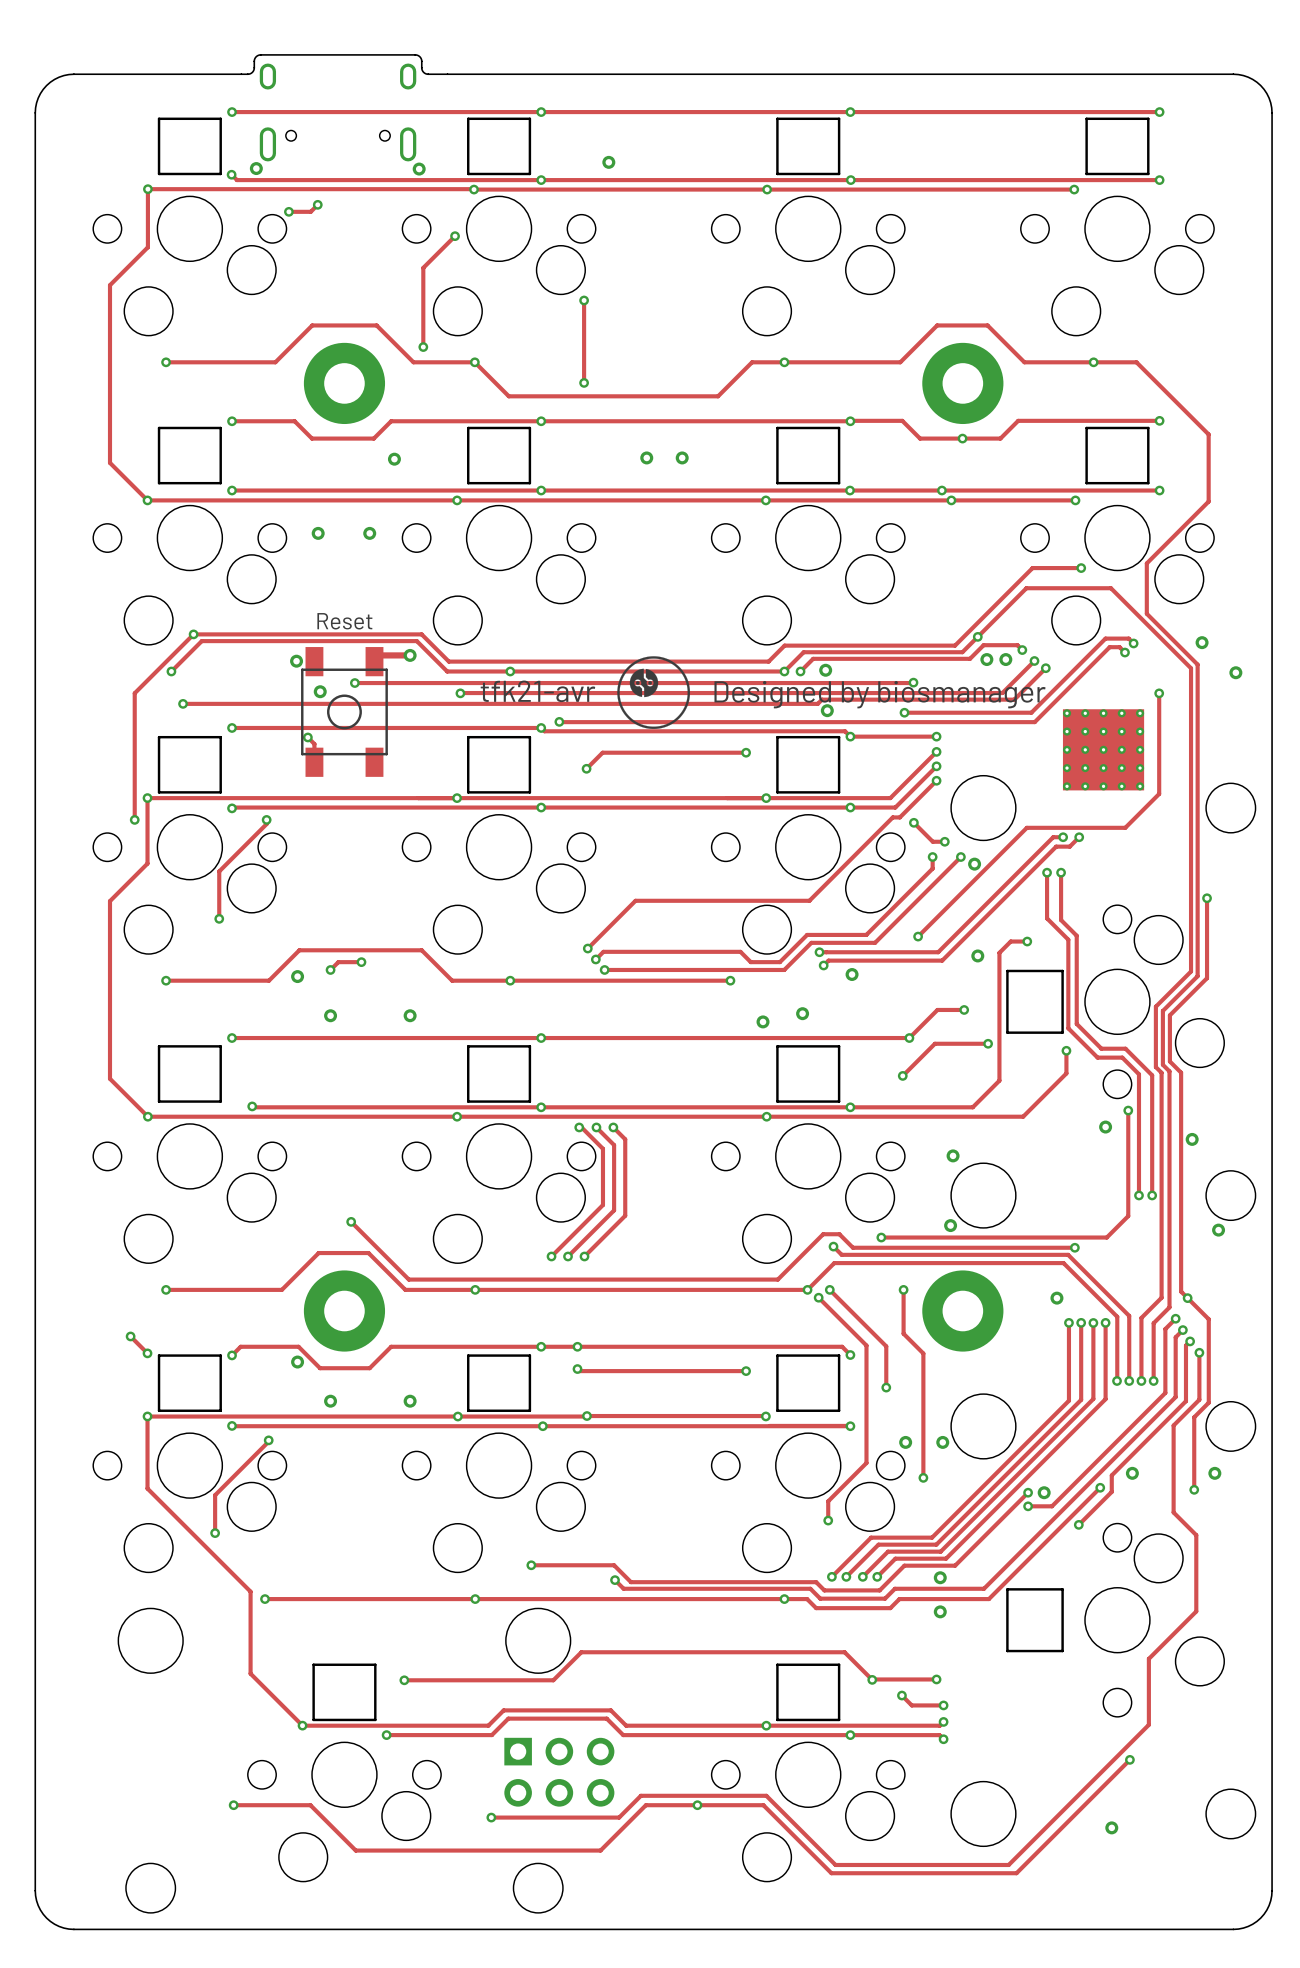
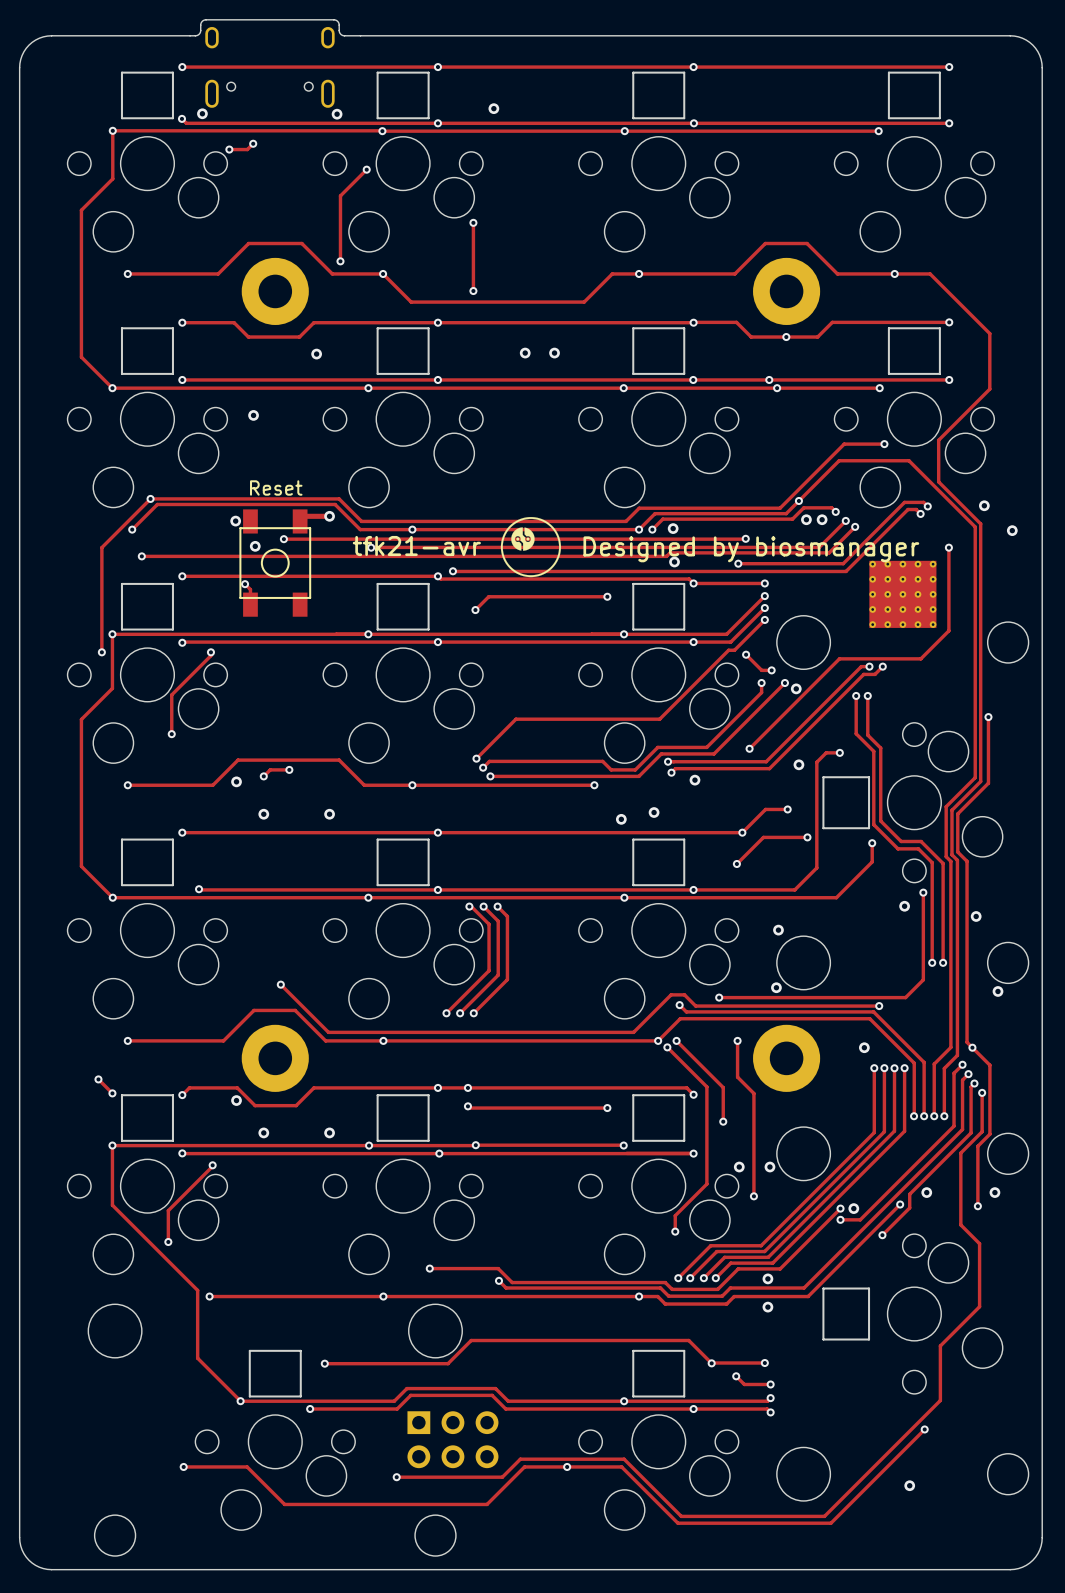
via: (369, 533) -> none

